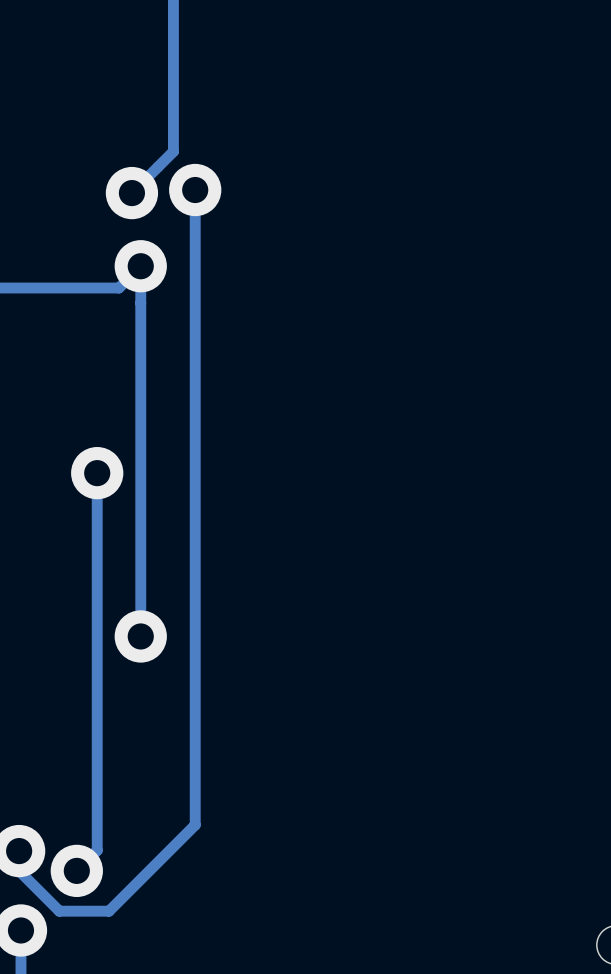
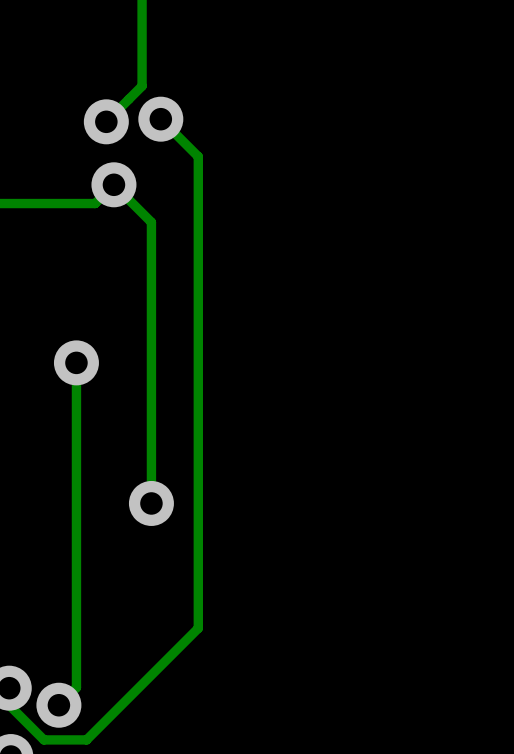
track: (195, 190) (195, 825) -> (160, 119) (198, 156) (198, 628) (160, 665)
track: (140, 266) (140, 636) -> (113, 184) (151, 222) (151, 503)
via position: (140, 636) -> (151, 503)

